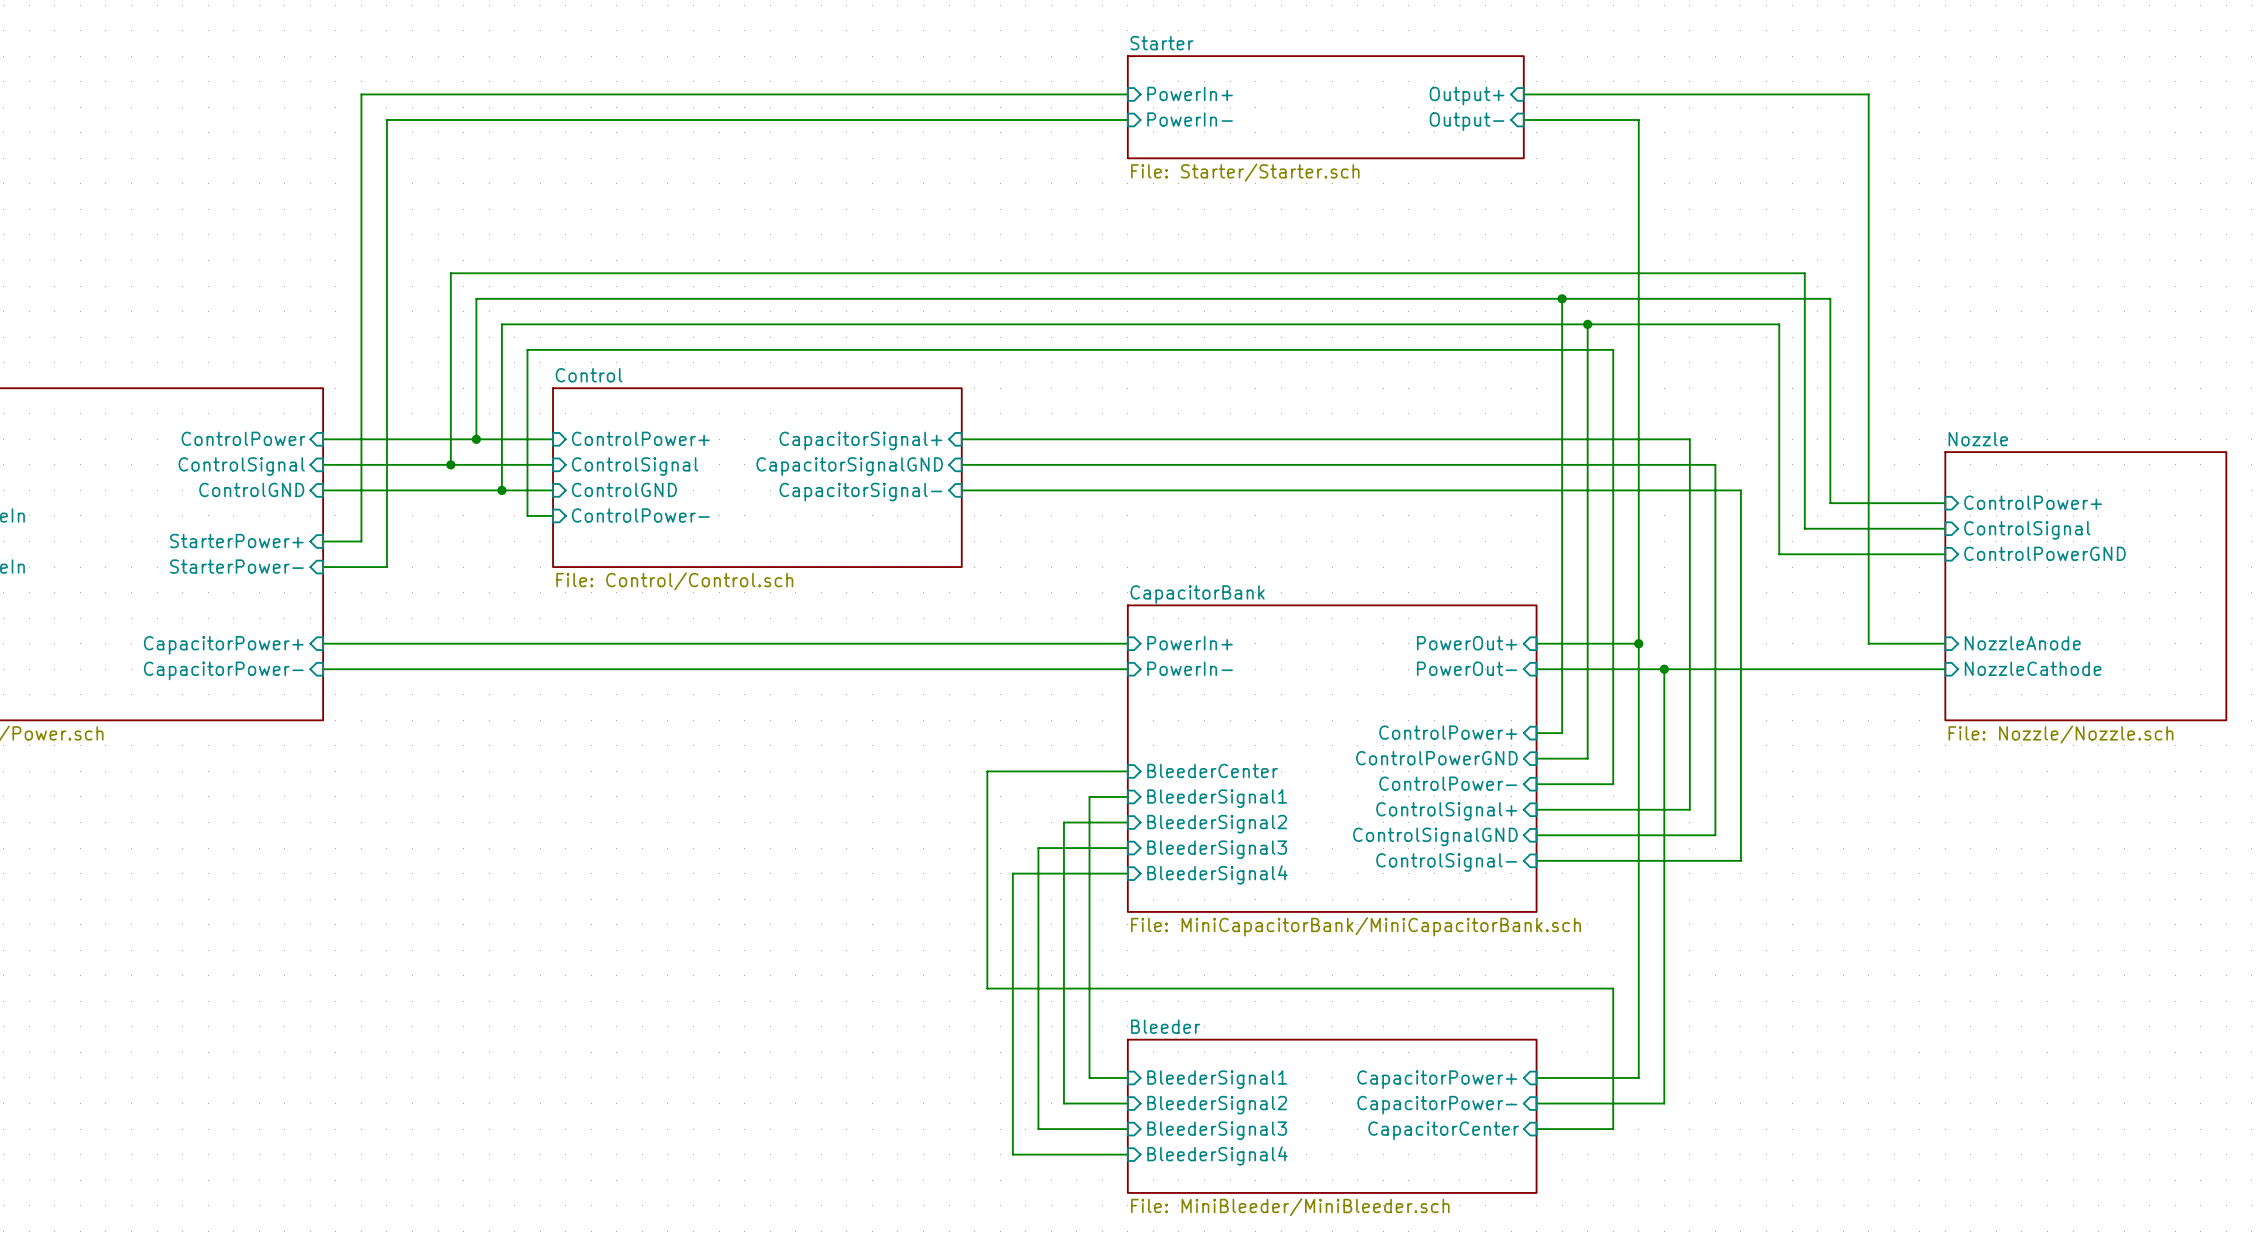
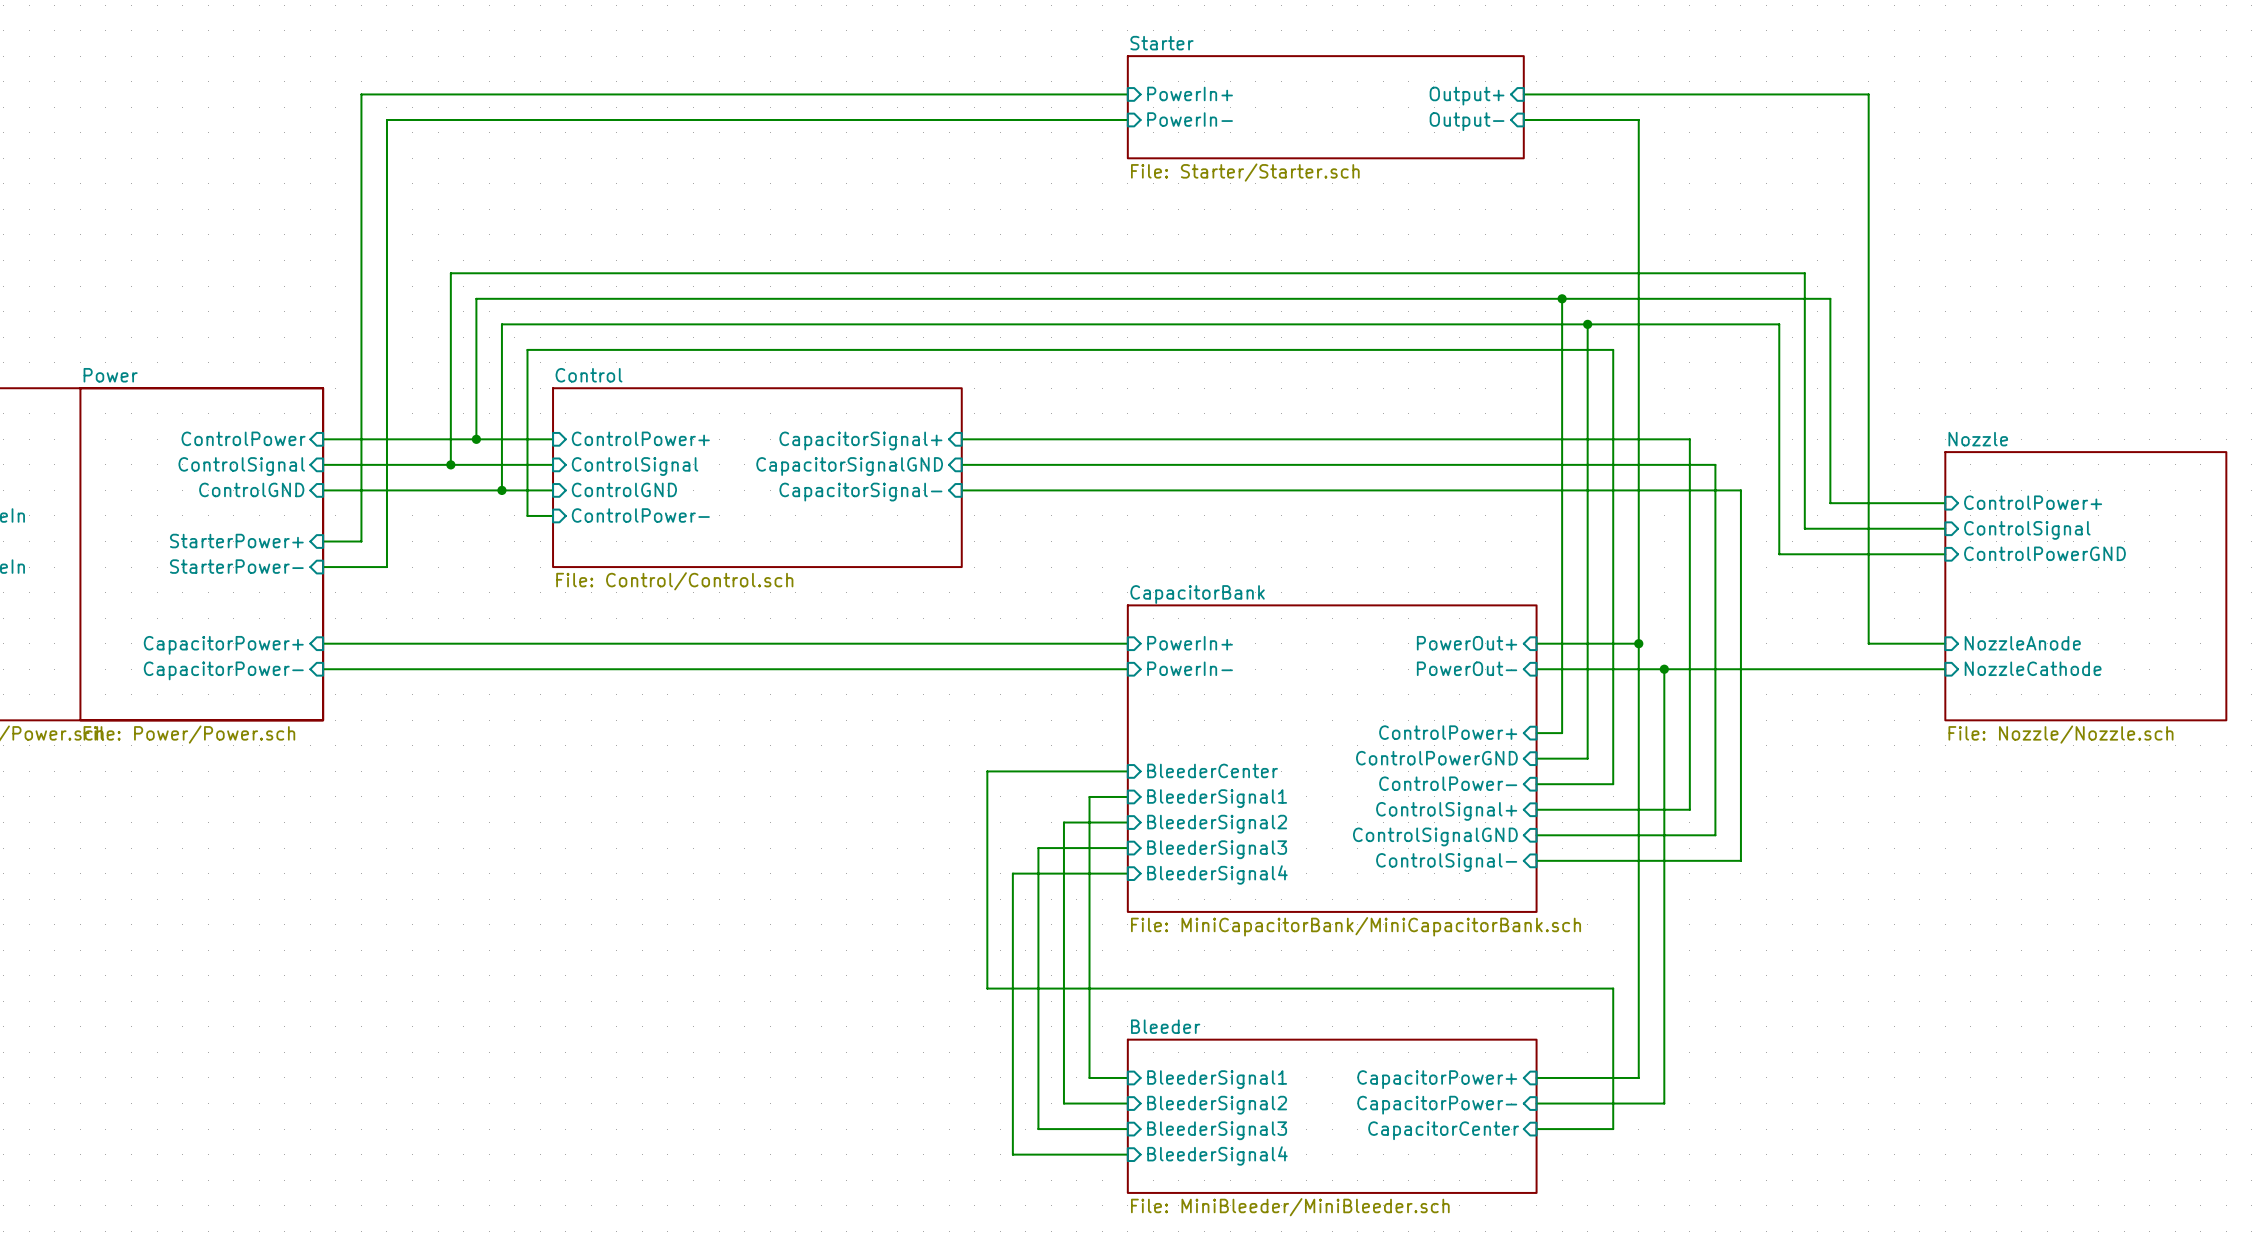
sheet Power: none -> File: Power/Power.sch (201, 554)

